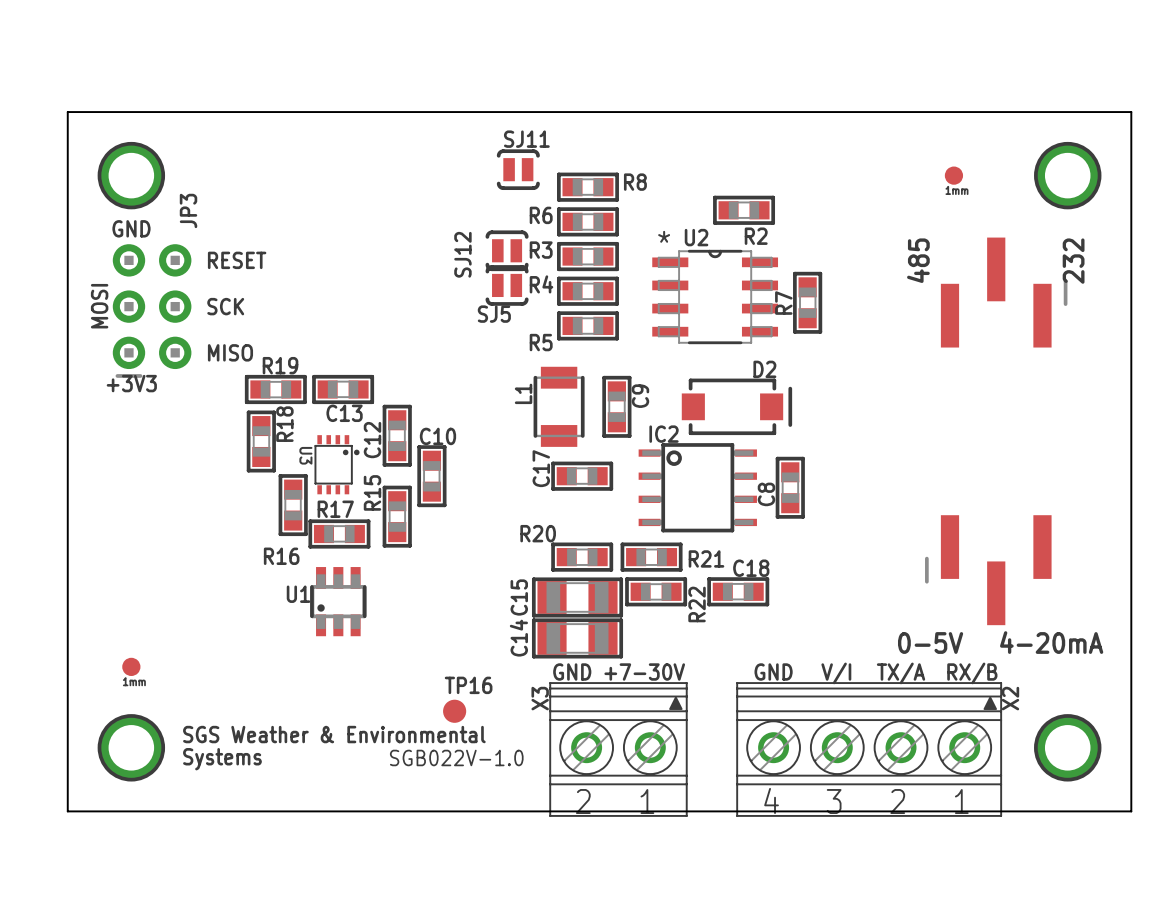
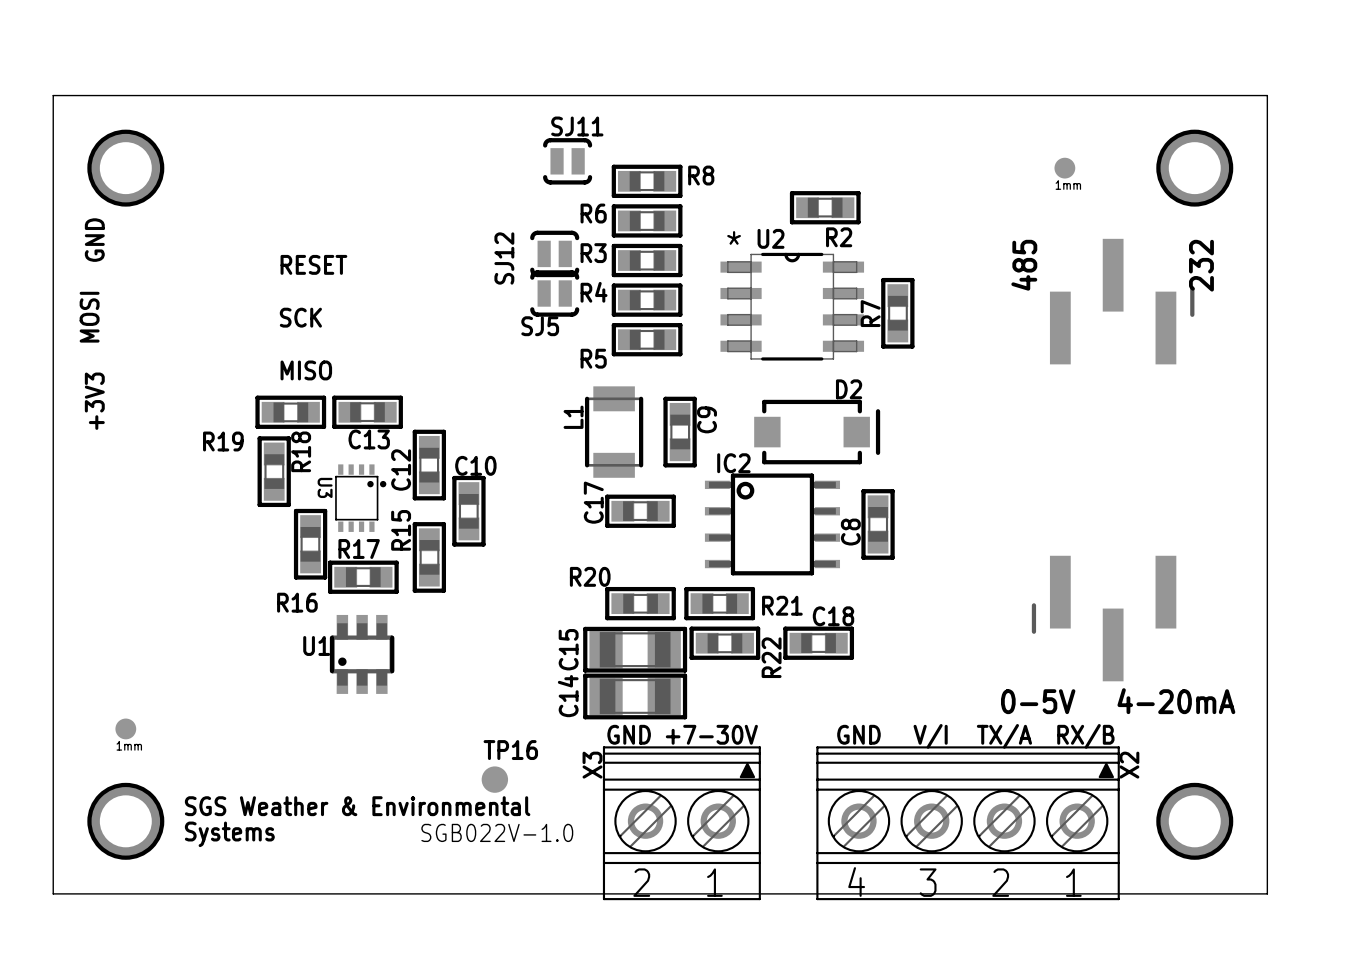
text rotation: 0° (131, 228) -> 90° counterclockwise (94, 240)
text position: RESET (237, 260) -> RESET (313, 264)
text position: SCK (225, 306) -> SCK (300, 317)
JP3: (152, 311) -> none
text position: MISO (230, 352) -> MISO (306, 370)
R19 name position: R19 (280, 365) -> R19 (223, 441)
text rotation: 0° (131, 383) -> 90° counterclockwise (94, 401)

